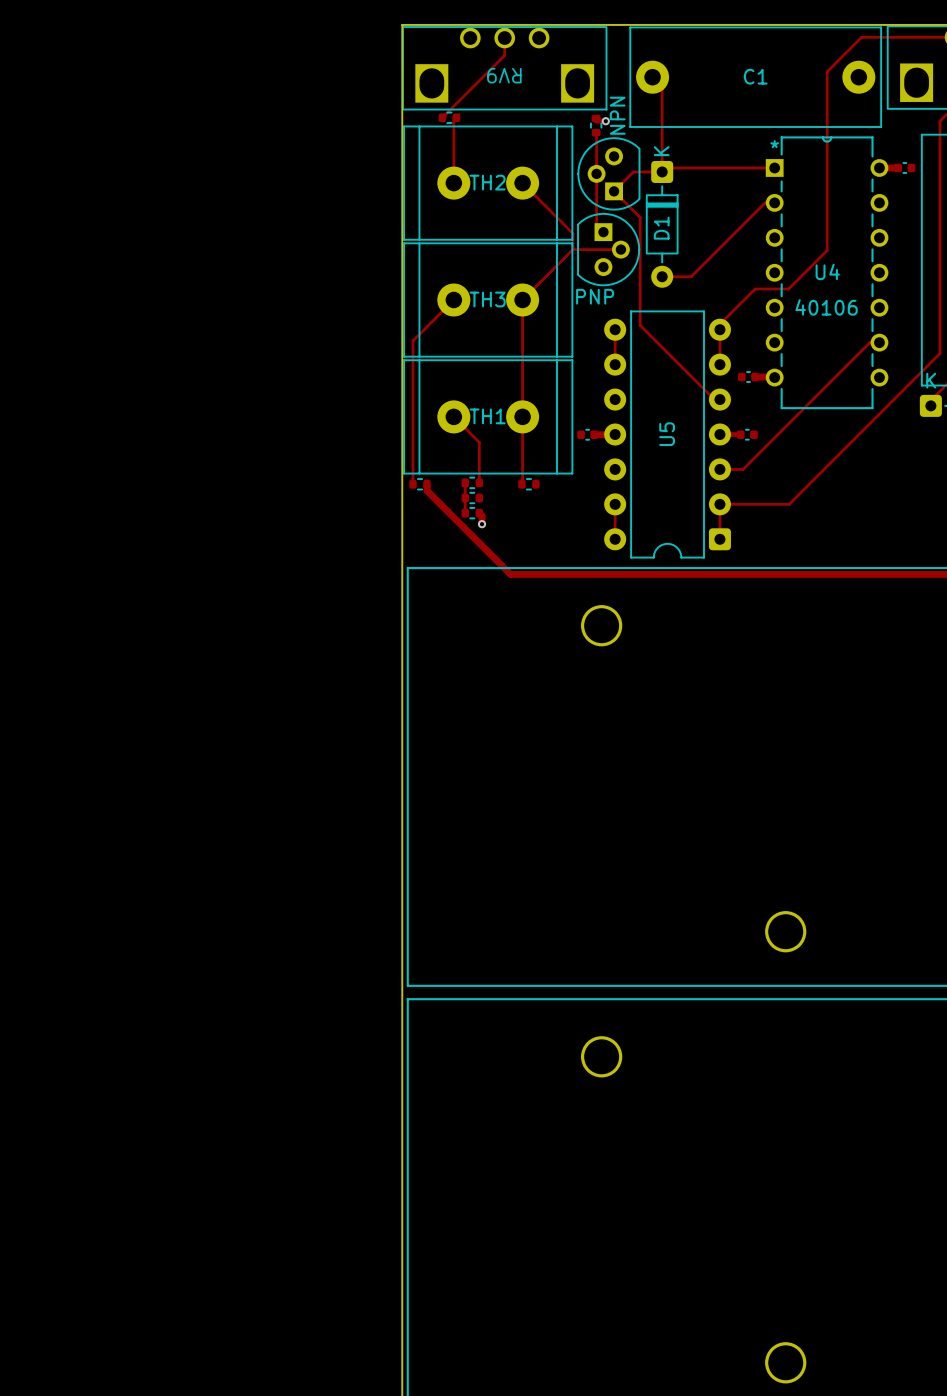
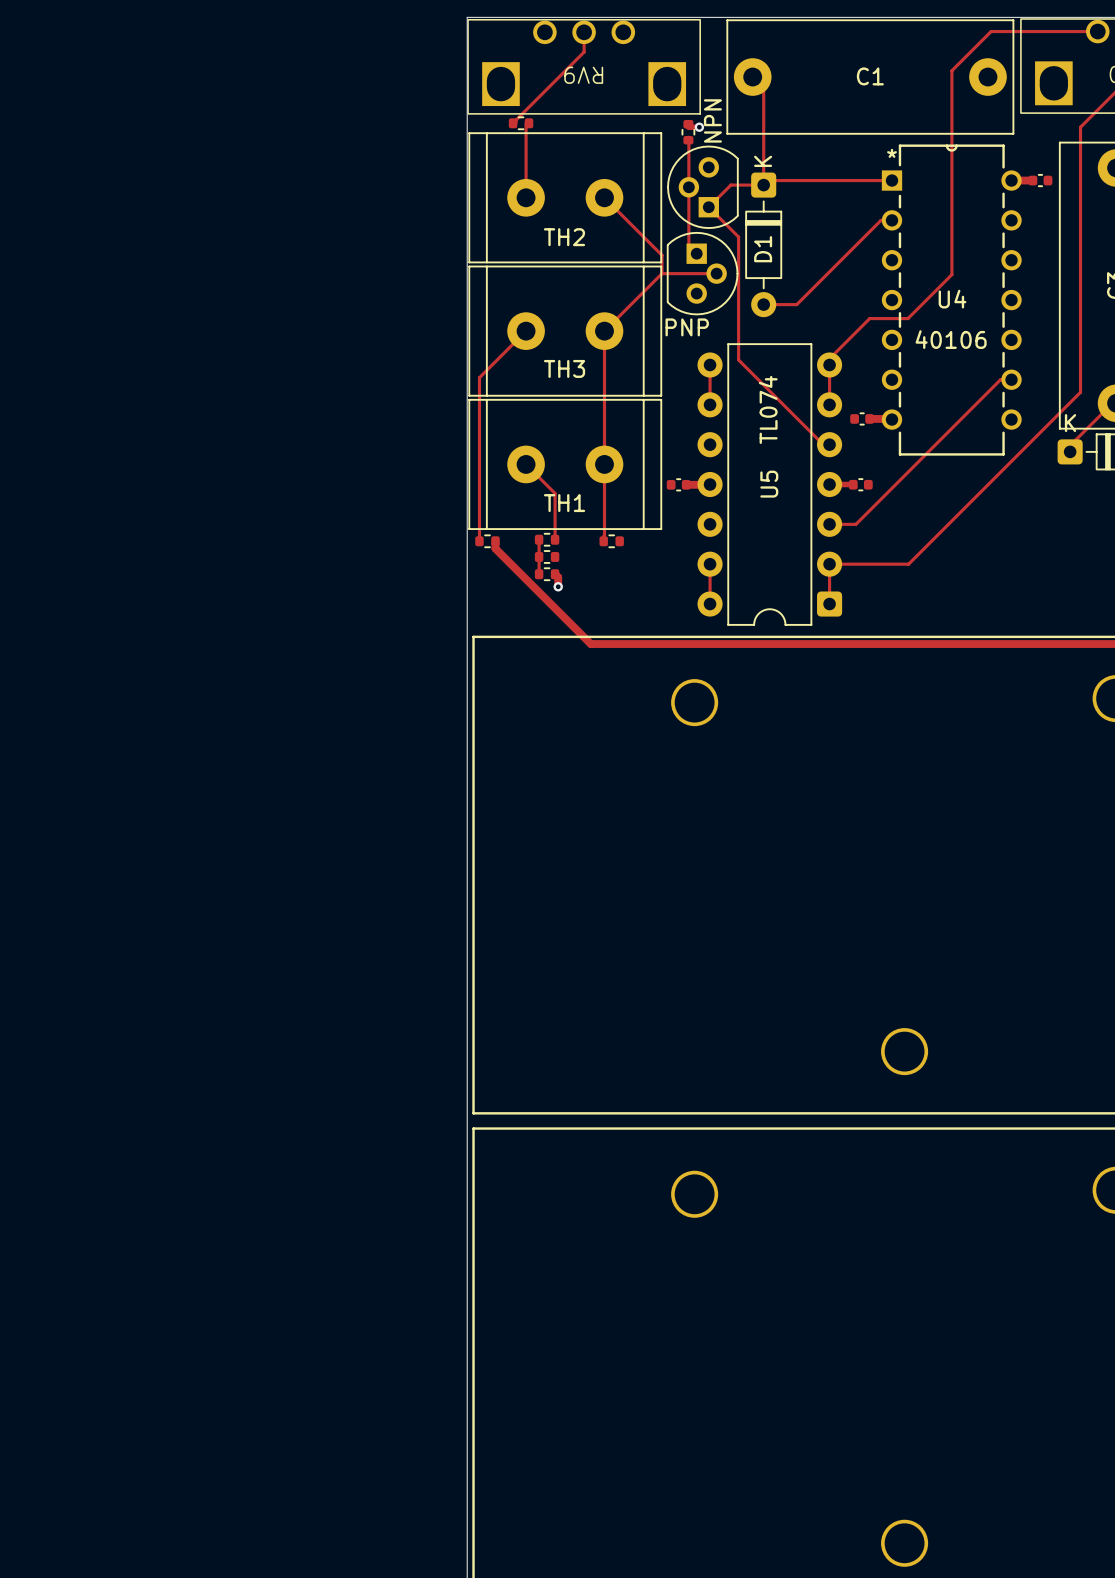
TH2 name position: TH2 (487, 182) -> TH2 (564, 237)
TH3 name position: TH3 (487, 299) -> TH3 (564, 368)
U5 value: none -> TL074 (768, 409)
TH1 name position: TH1 (487, 416) -> TH1 (564, 503)

